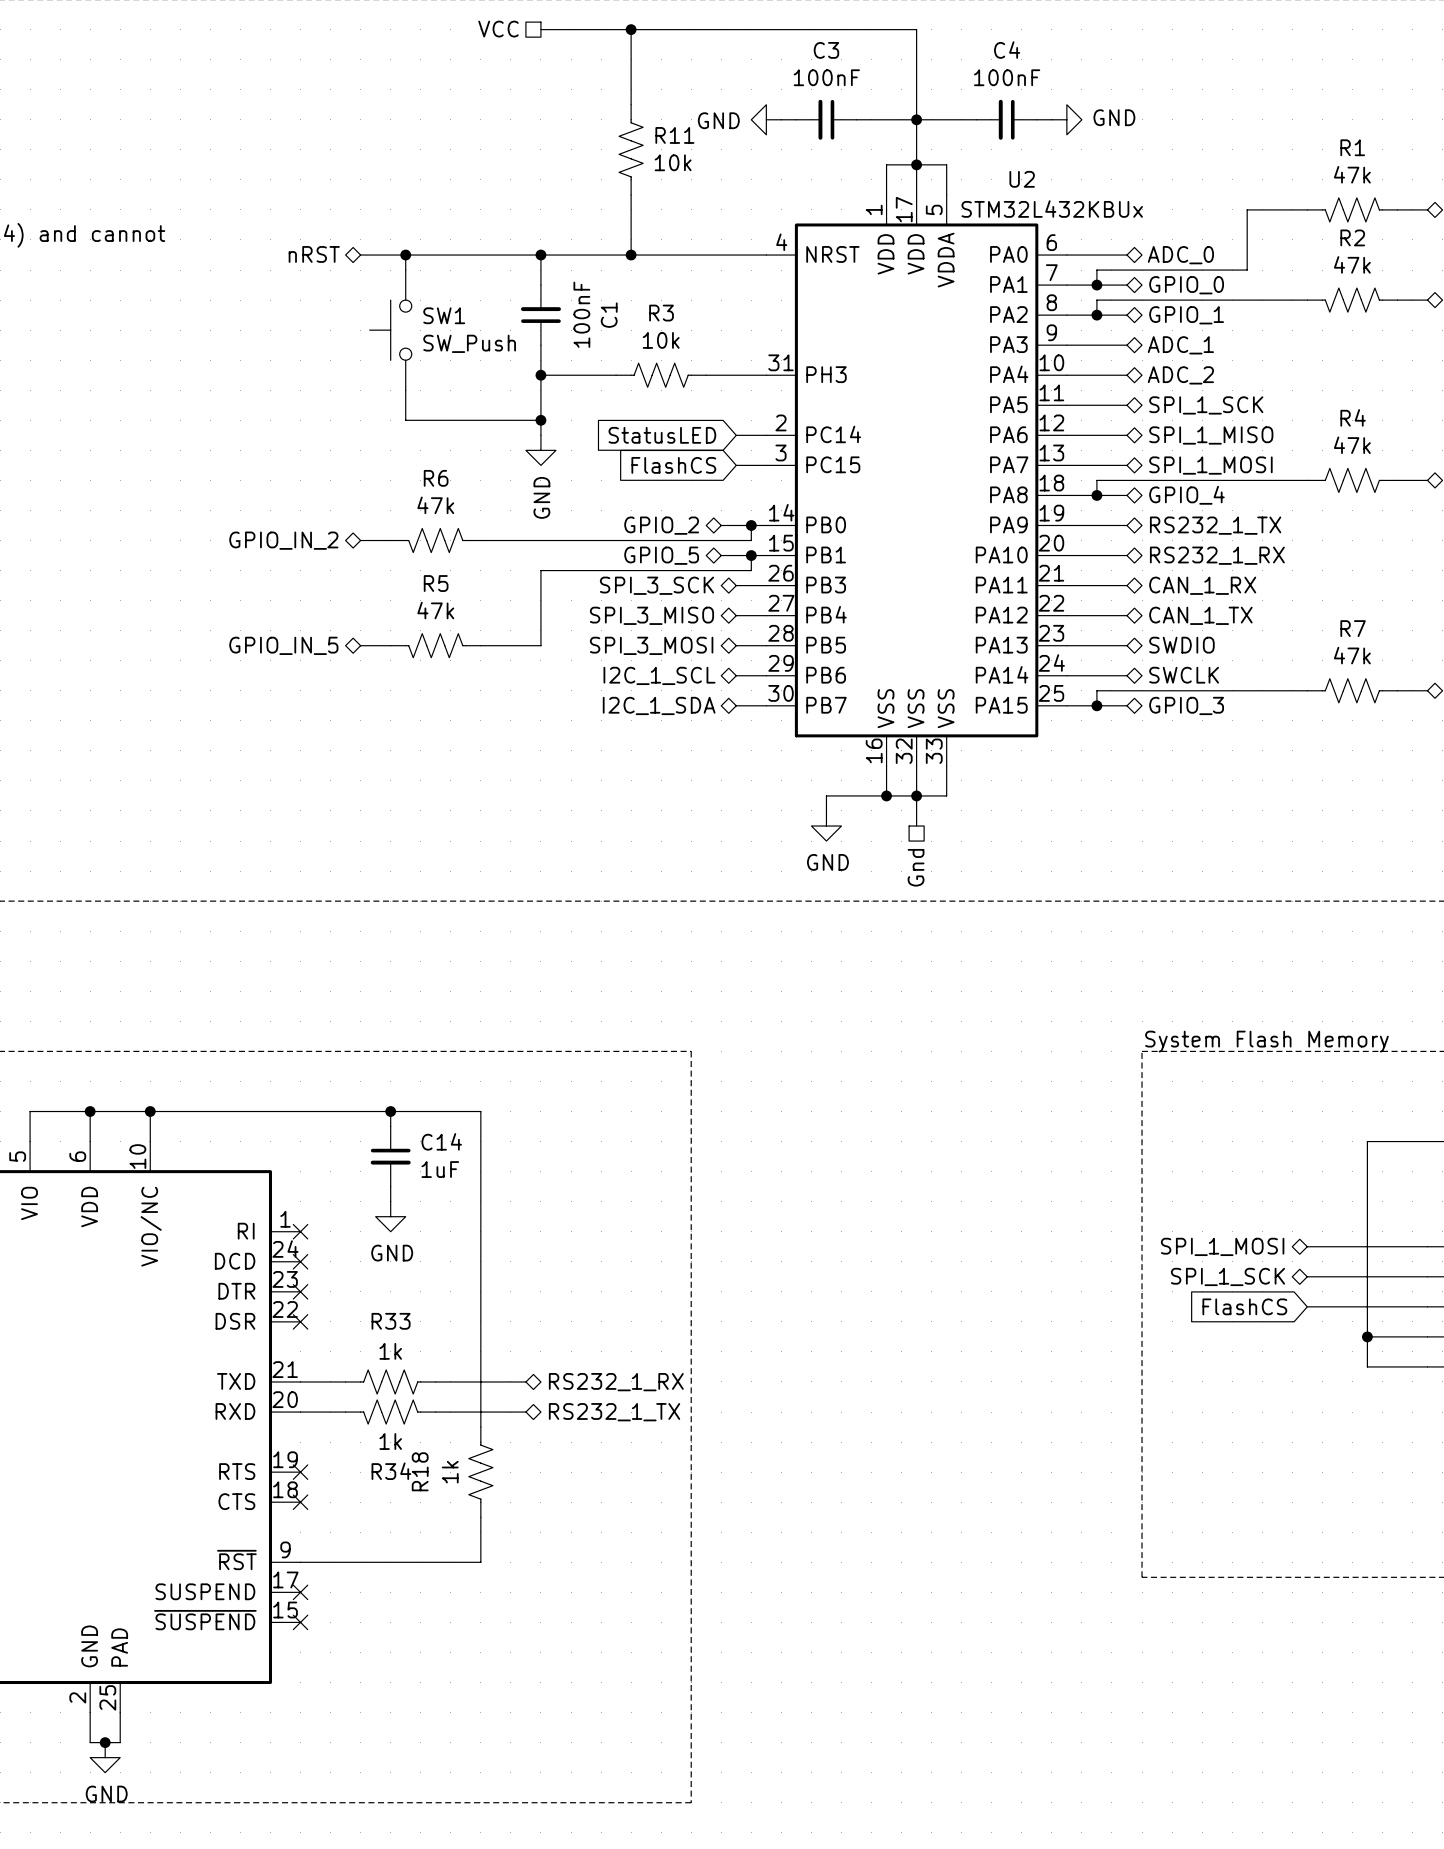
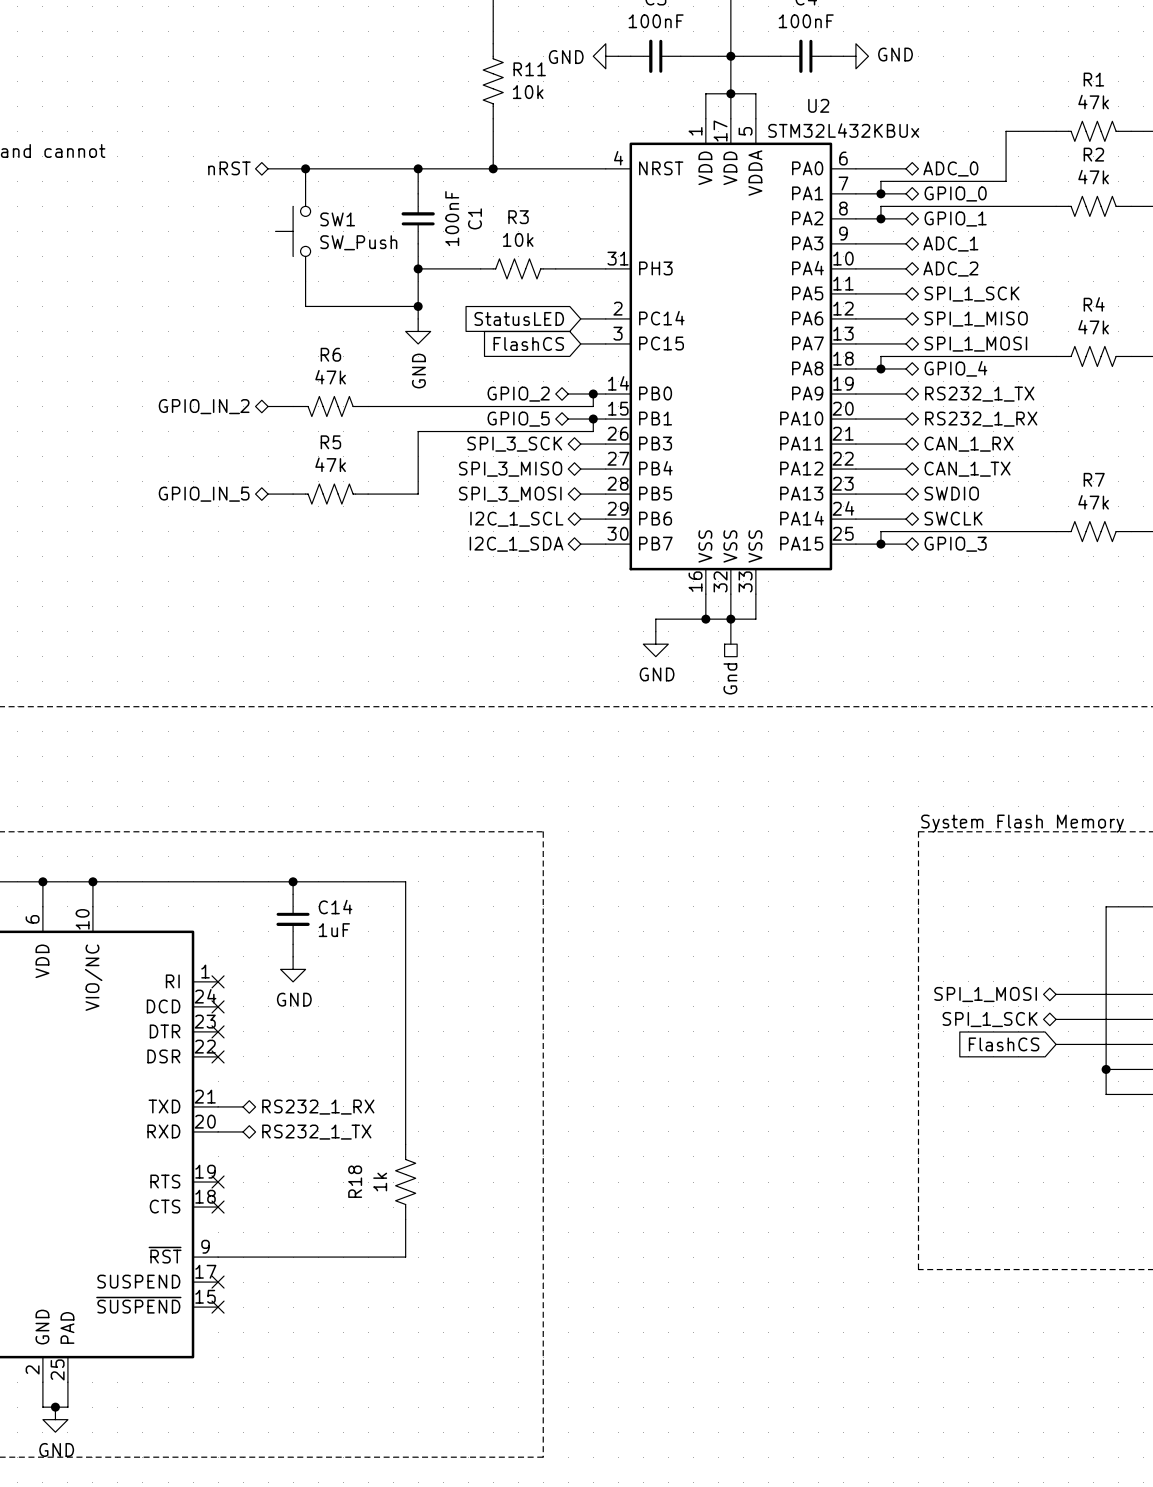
wire: (480, 1111) (480, 1427) -> (368, 881) (405, 881) (405, 1144)
wire: (330, 1381) (345, 1381) -> none
R33: 1k (390, 1381) -> none
wire: (435, 1381) (525, 1381) -> none
hierarchical label position: RS232_1_RX (616, 1382) -> RS232_1_RX (318, 1107)
wire: (330, 1412) (345, 1412) -> none
R34: 1k (390, 1412) -> none
wire: (435, 1412) (525, 1412) -> none
hierarchical label position: RS232_1_TX (614, 1412) -> RS232_1_TX (316, 1132)
R18 position: (480, 1472) -> (405, 1182)
wire: (480, 1517) (480, 1562) -> (405, 1219) (405, 1257) (368, 1257)

